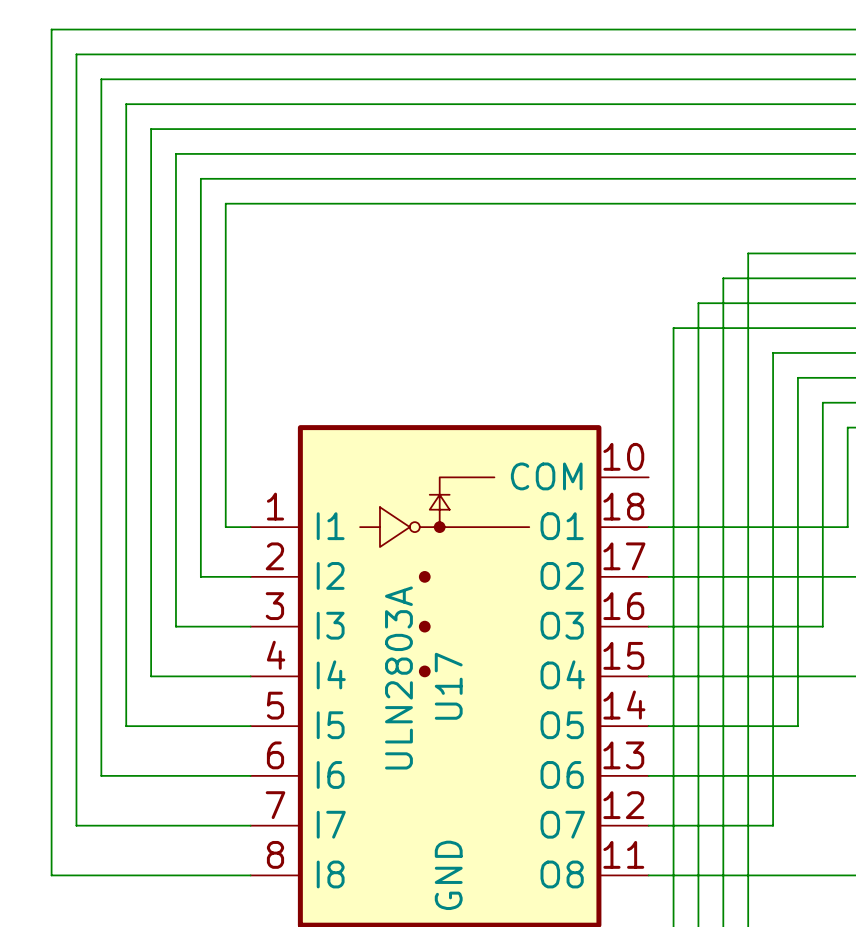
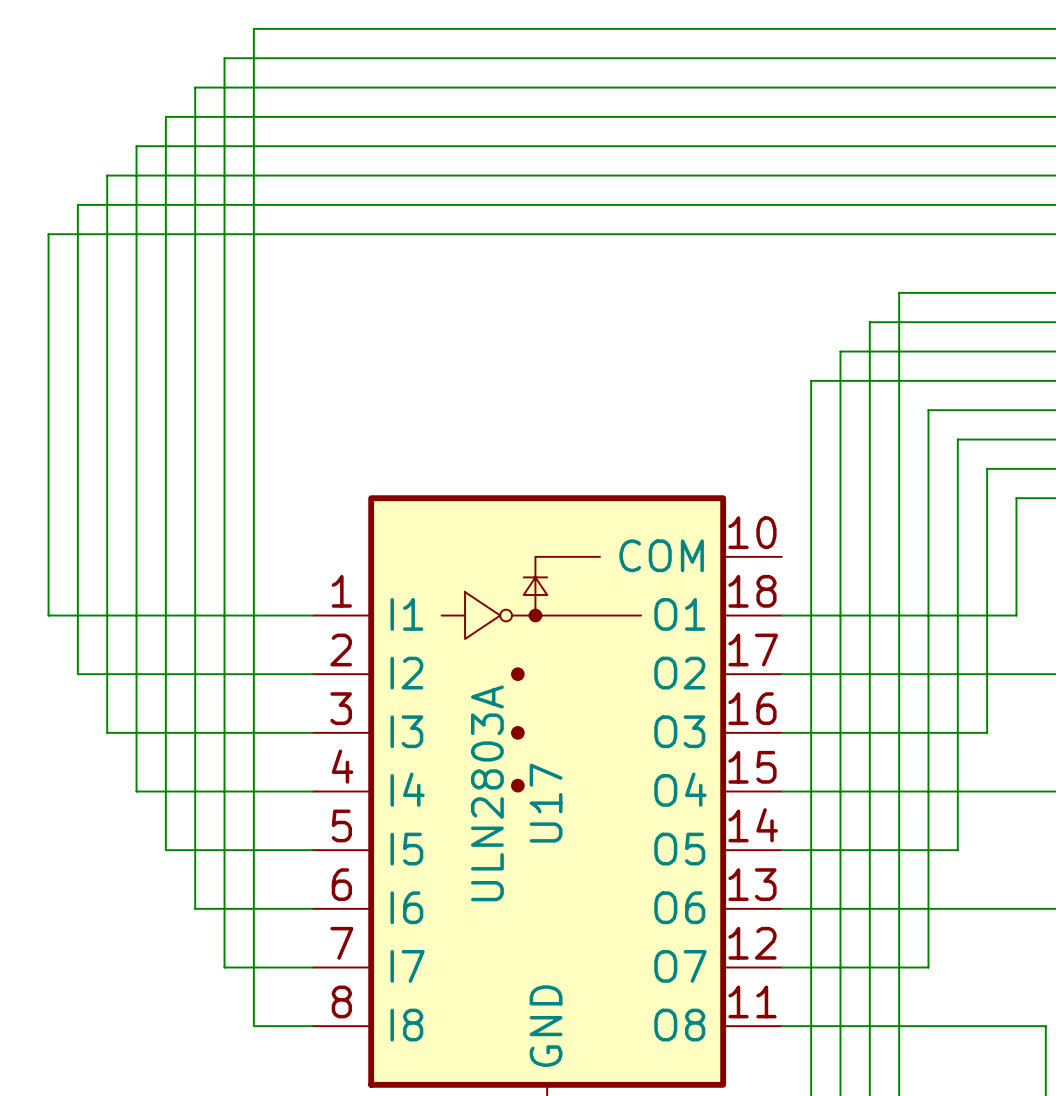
wire: (200, 29) (51, 29) (51, 178) -> (253, 28) (253, 204) (77, 204)
wire: (175, 54) (76, 54) (76, 153) -> (224, 58) (224, 175) (107, 175)
wire: (151, 79) (101, 79) (101, 129) -> (195, 87) (195, 146) (136, 146)
wire: (225, 203) (225, 527) -> (283, 234) (48, 234) (48, 615) (283, 615)
wire: (51, 576) (51, 875) (200, 875) -> (77, 674) (253, 674) (253, 1026)
wire: (76, 626) (76, 825) (175, 825) -> (107, 732) (224, 732) (224, 967)
wire: (101, 676) (101, 775) (151, 775) -> (136, 791) (195, 791) (195, 908)

